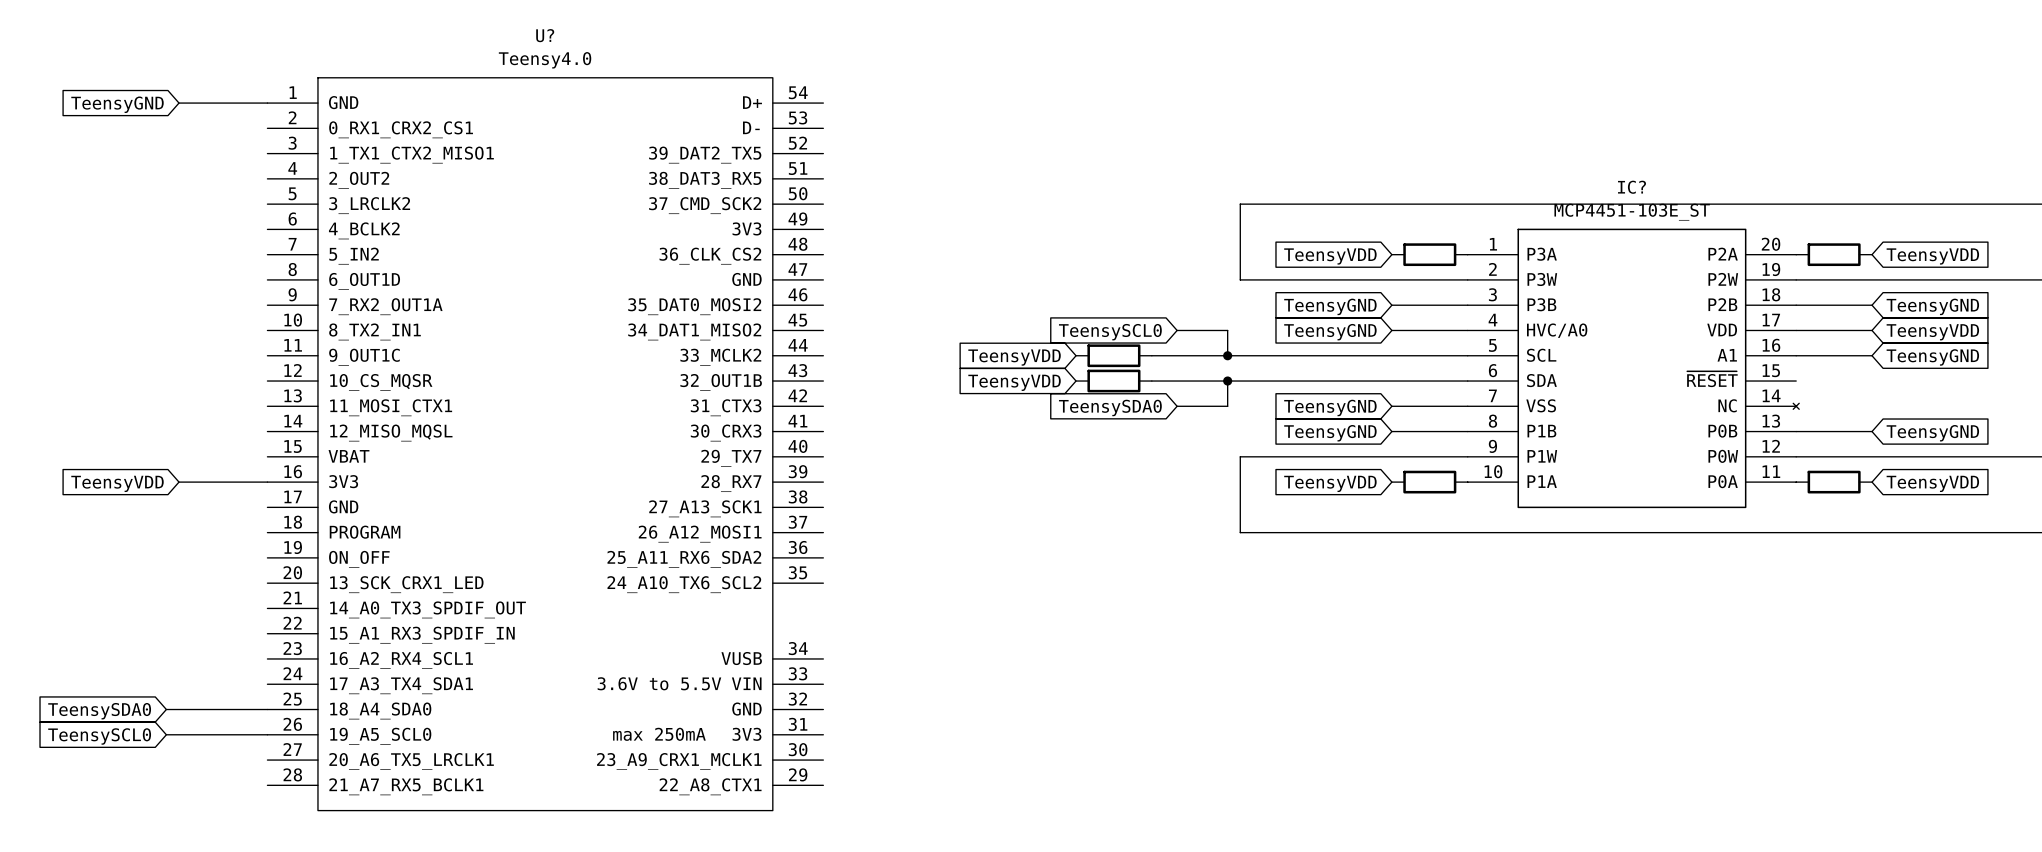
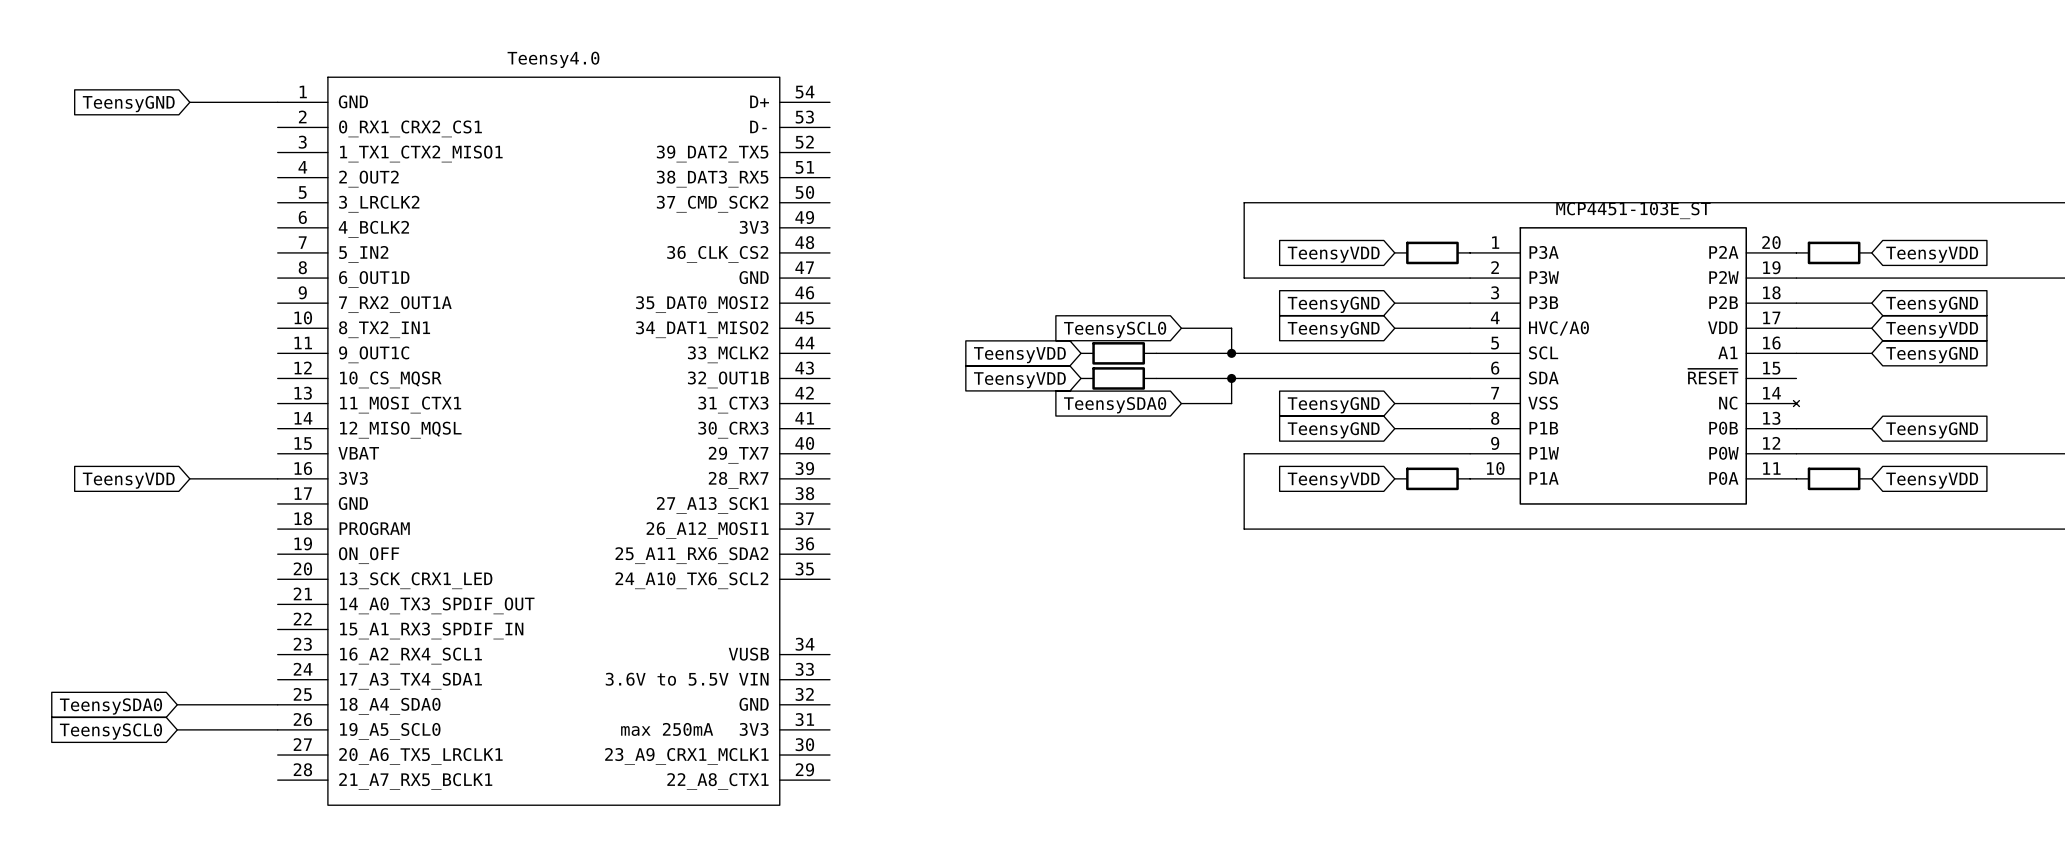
U? name: U? (545, 35) -> none
IC? name: IC? (1632, 187) -> none

